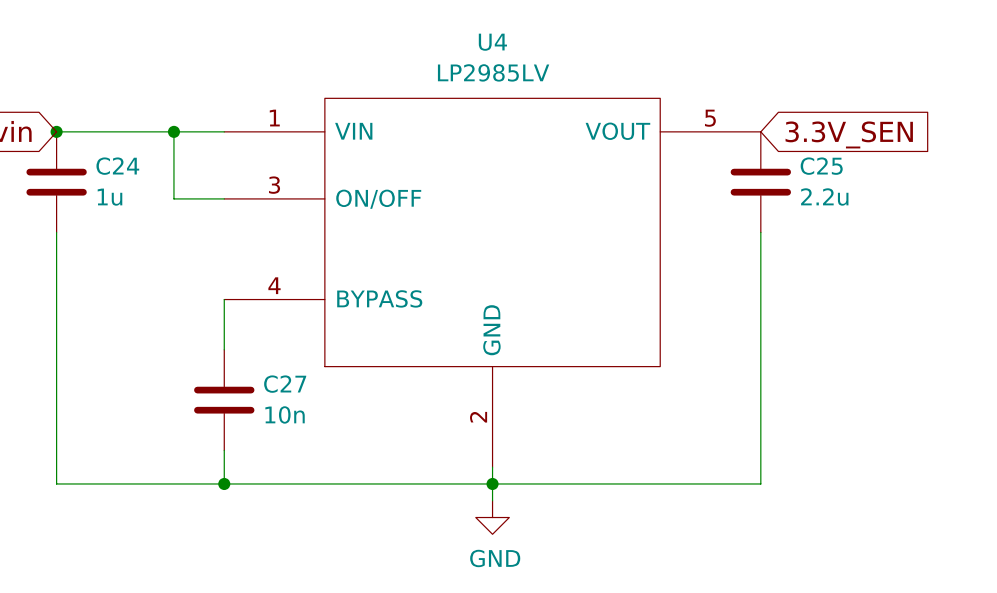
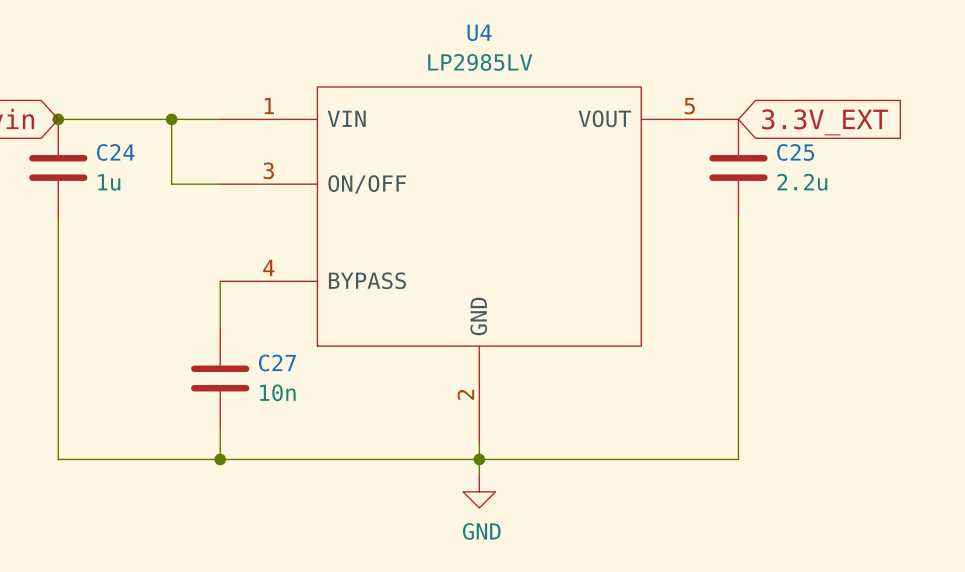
global label: 3.3V_SEN (849, 134) -> 3.3V_EXT (825, 122)

